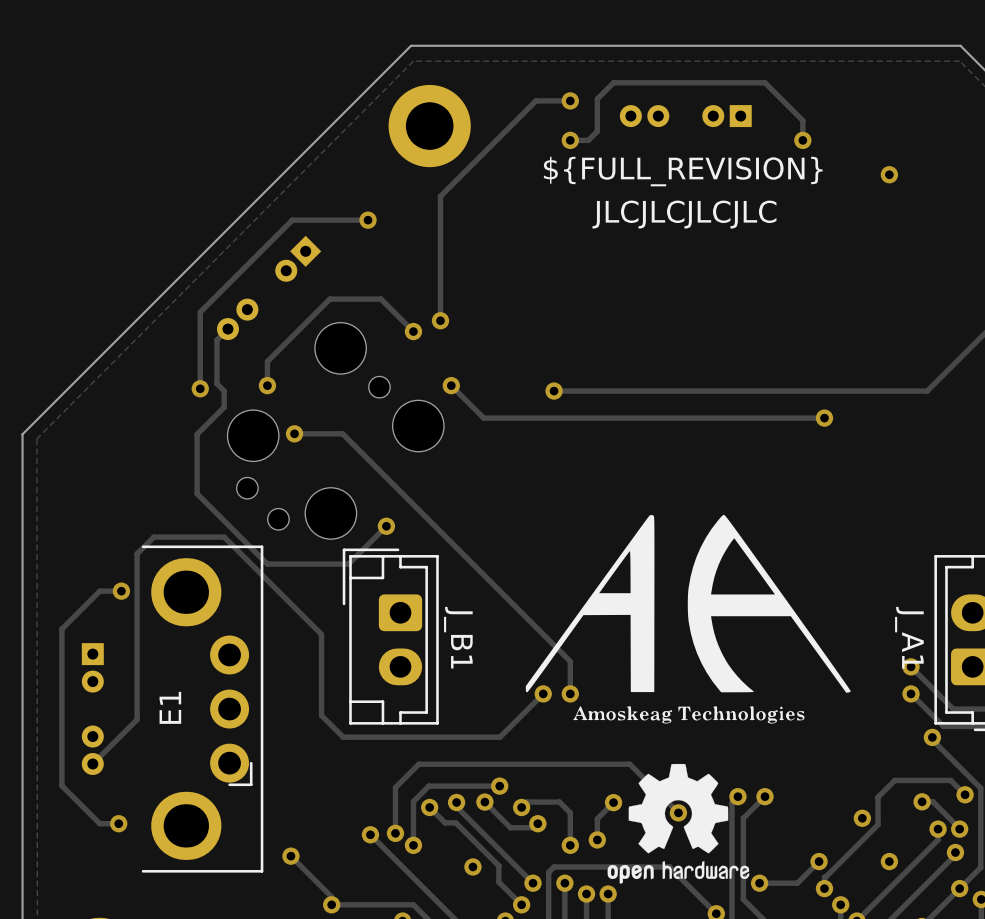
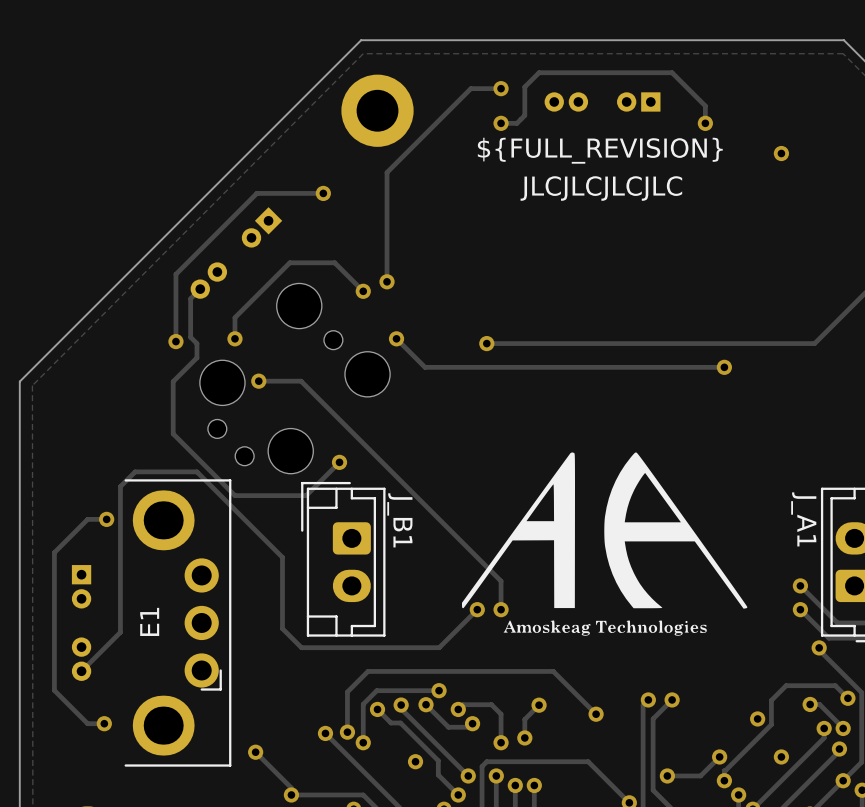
J_B1 name position: J_B1 (458, 637) -> J_B1 (399, 520)
J_A1 name position: J_A1 (909, 637) -> J_A1 (803, 519)
drawing: [607, 763, 750, 884] -> none

